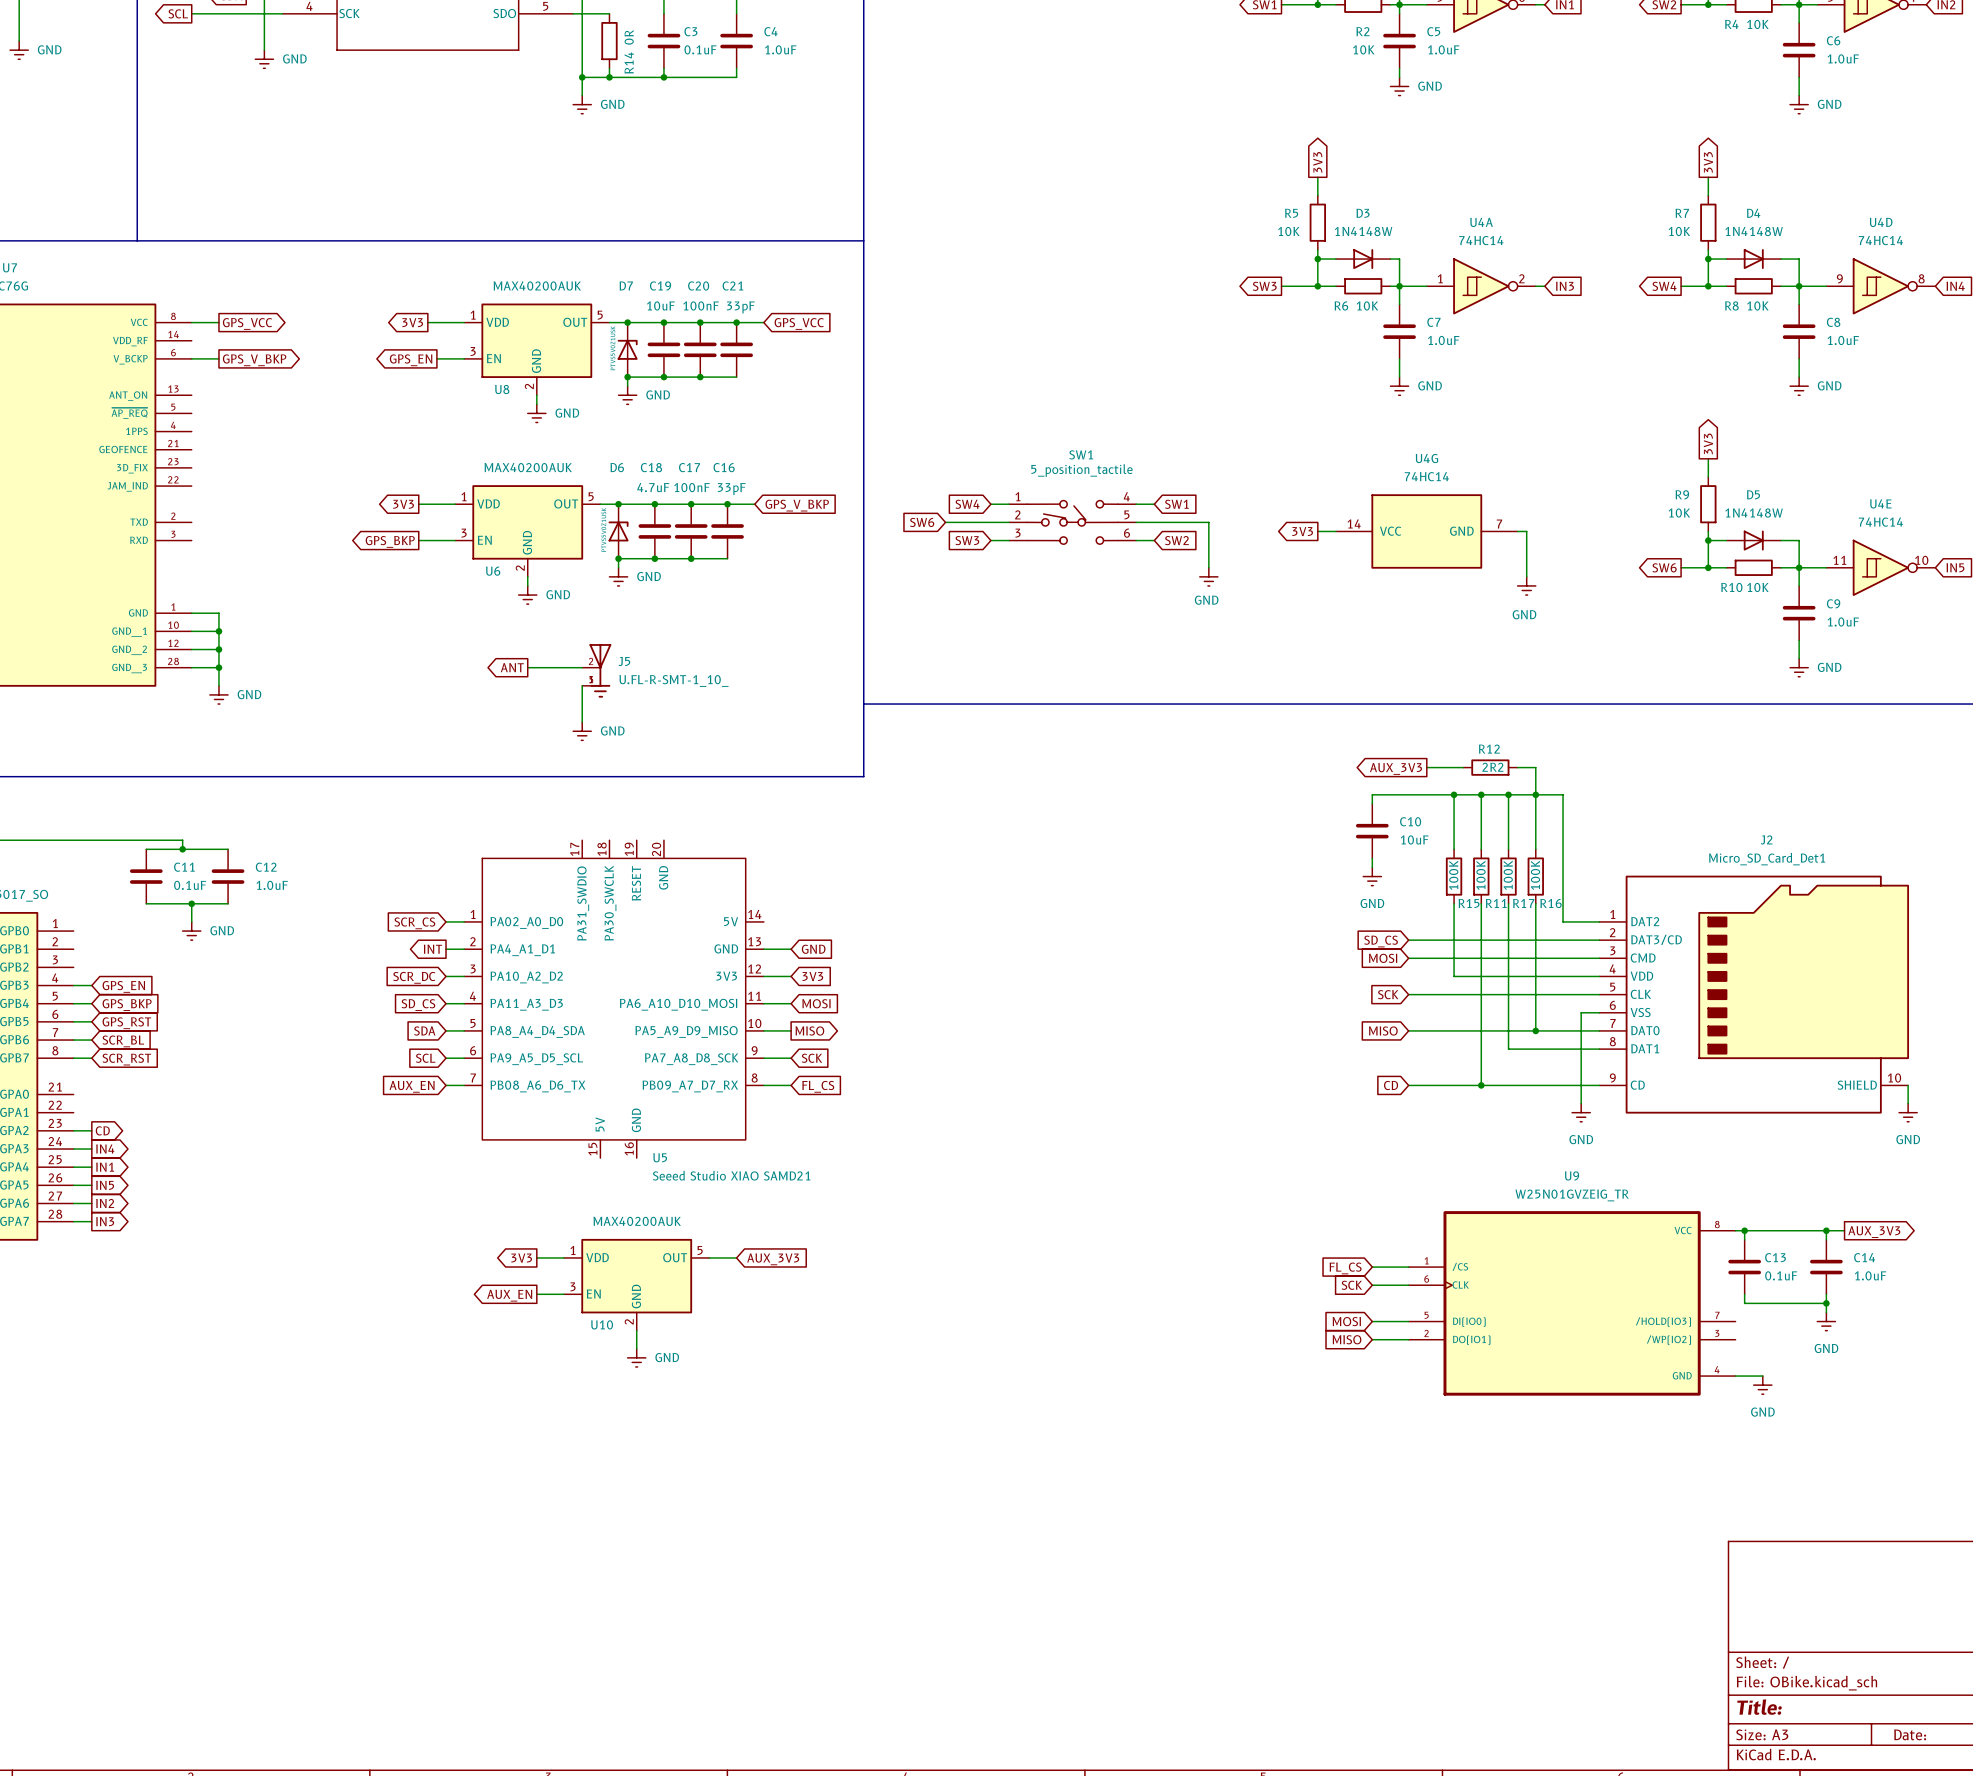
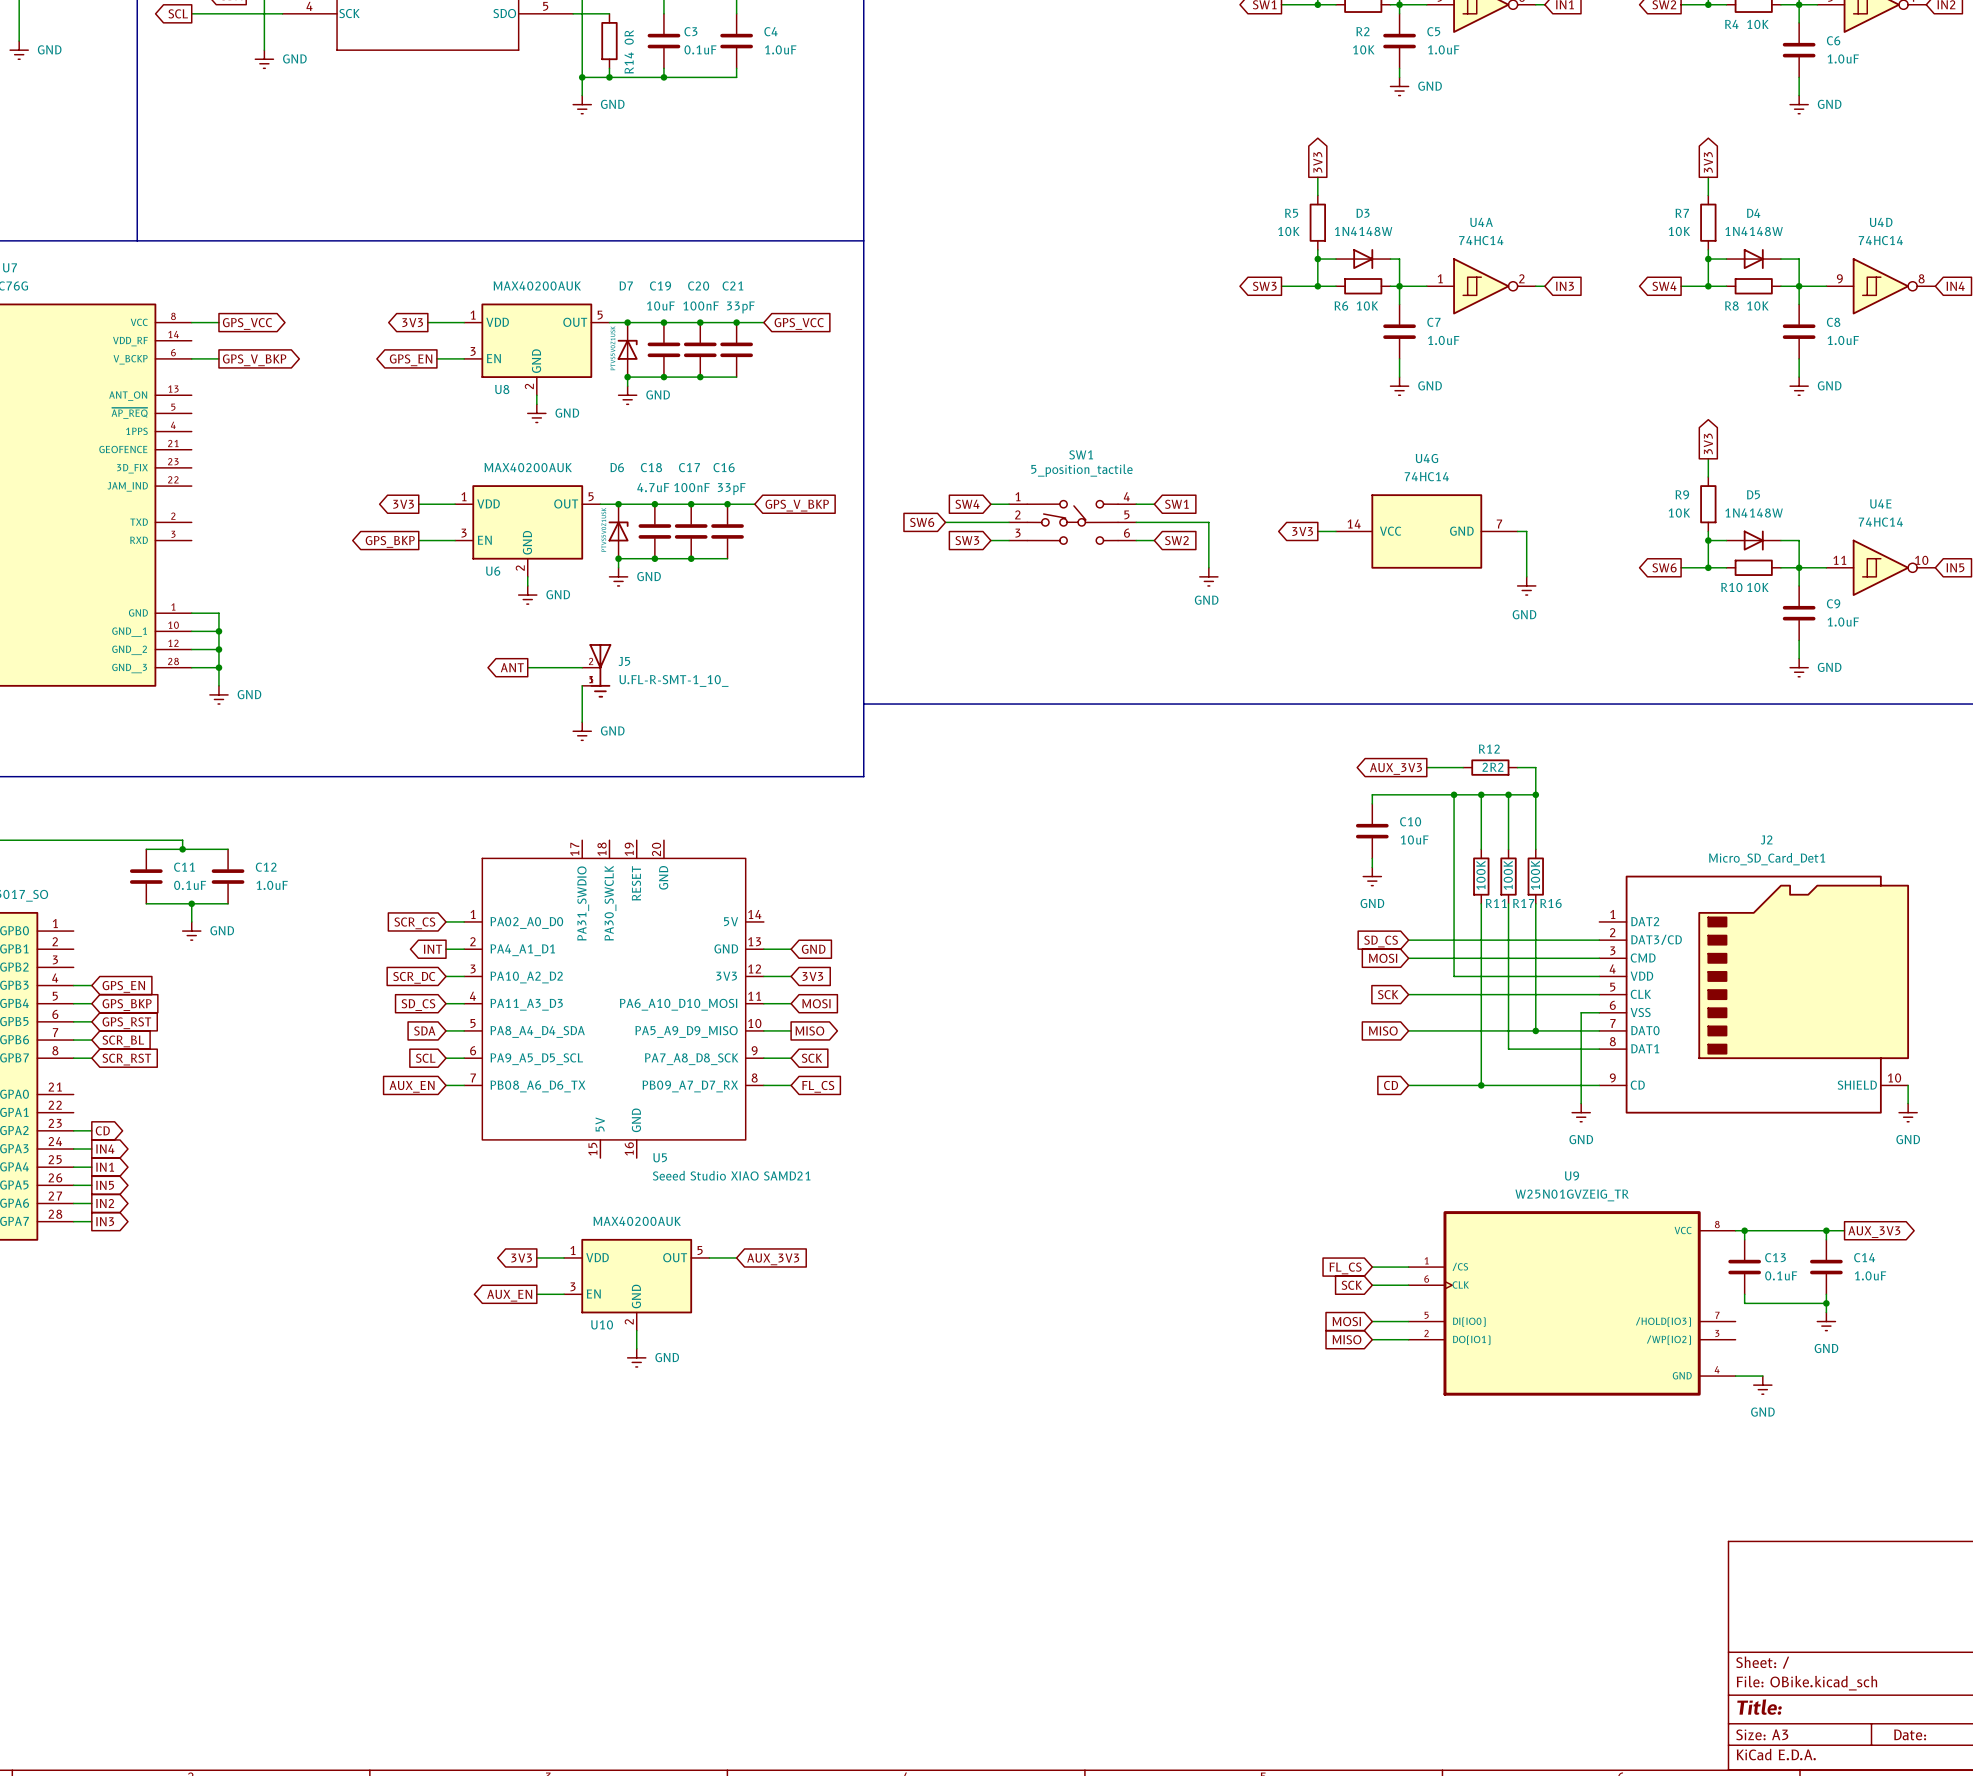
wire: (1535, 794) (1563, 794) (1563, 921) (1599, 921) -> none
R15: 100K (1454, 876) -> none

